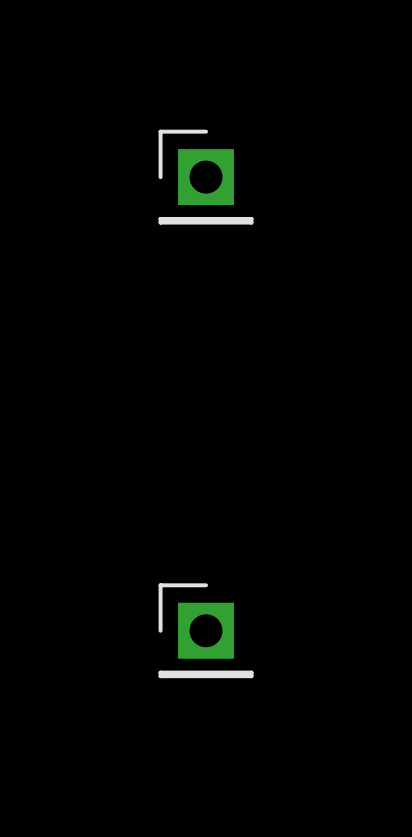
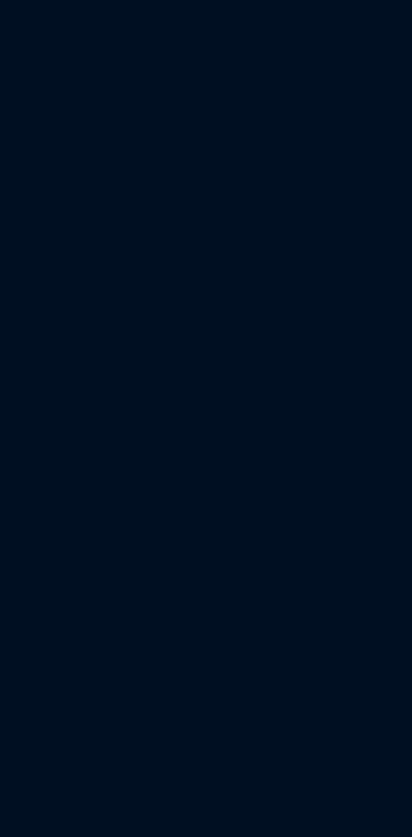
part: (206, 177) -> none
part: (206, 630) -> none

